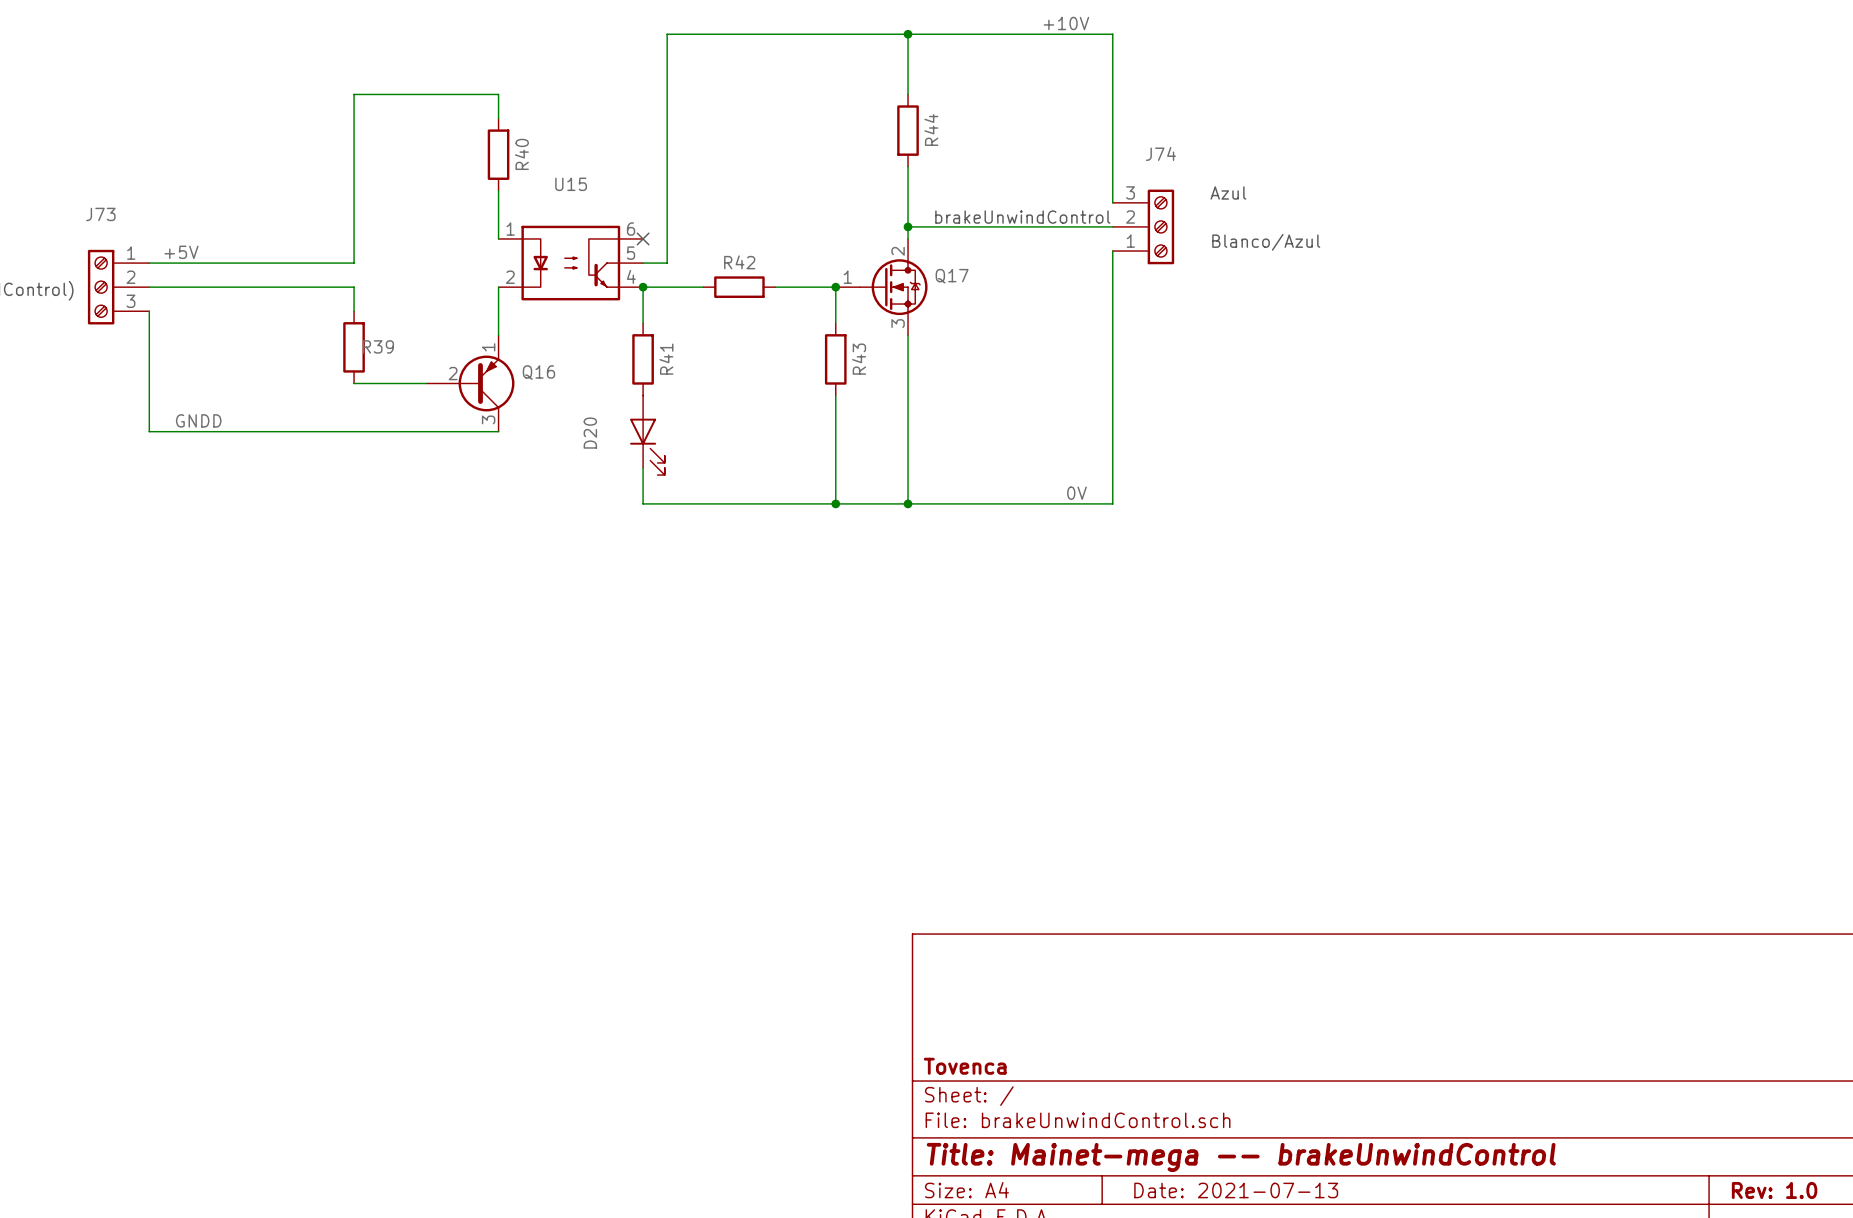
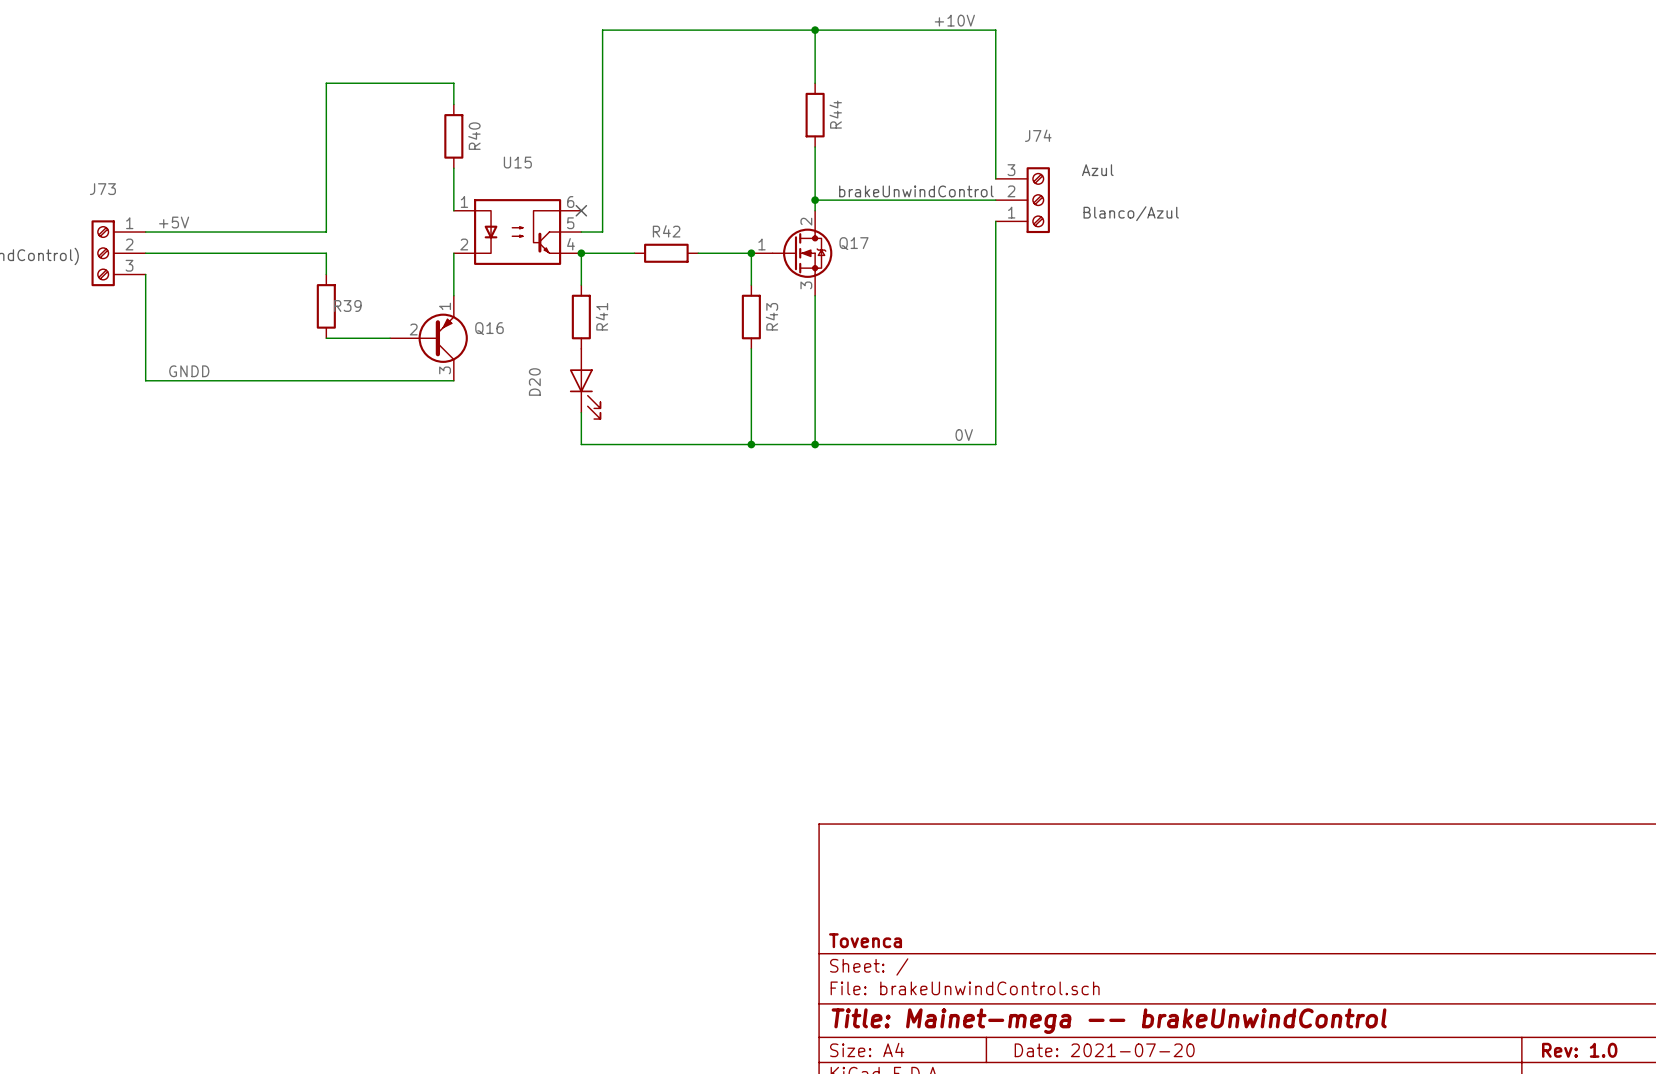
title block: Date: 2021-07-13 (1236, 1190) -> Date: 2021-07-20 (1104, 1050)

